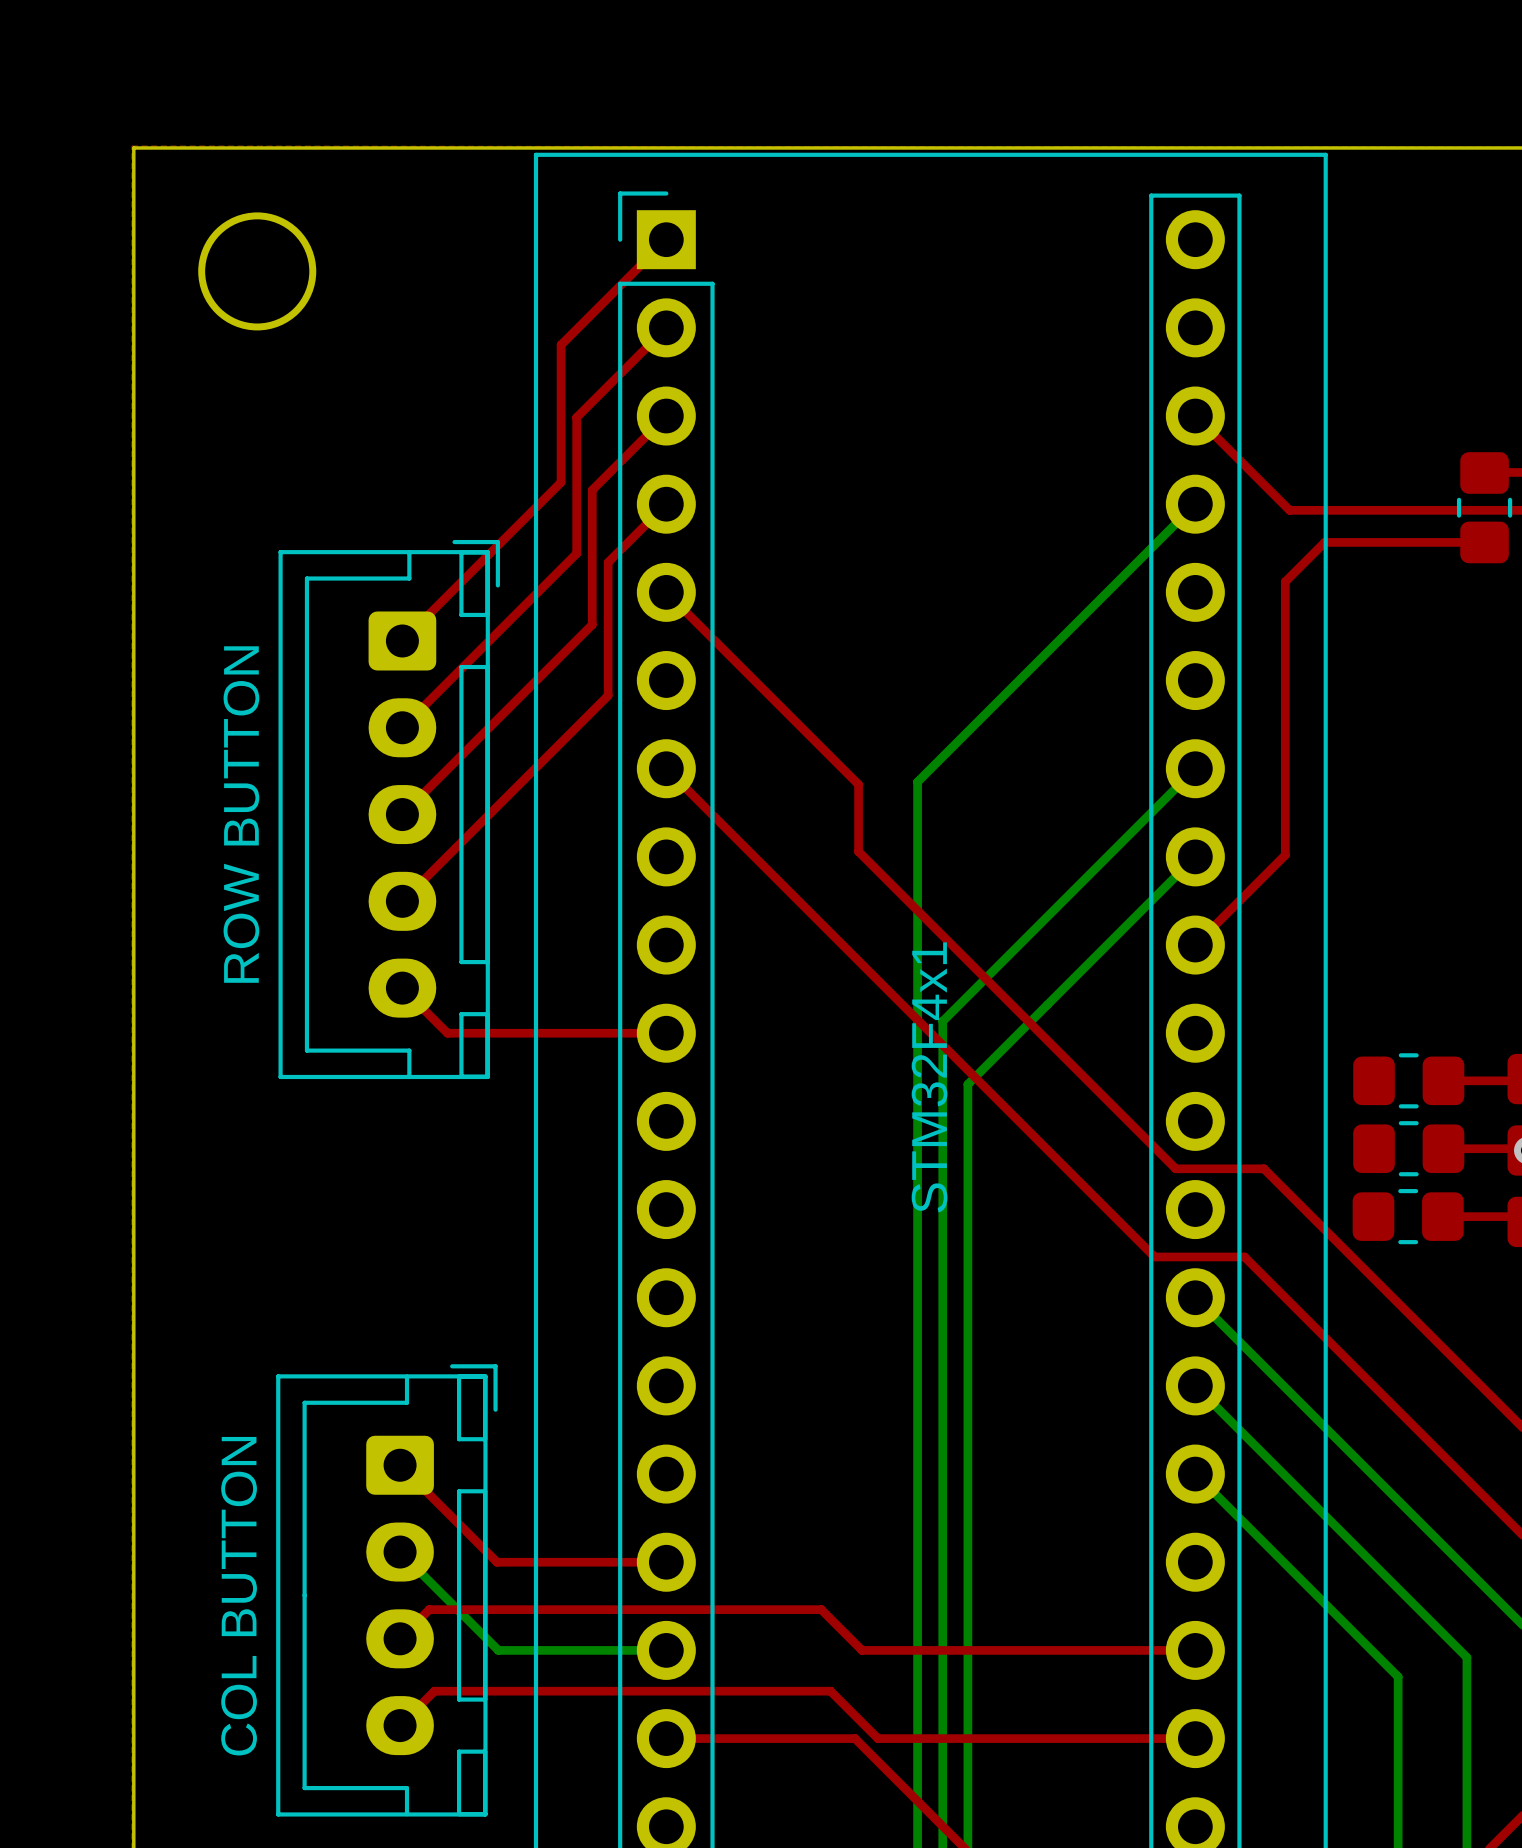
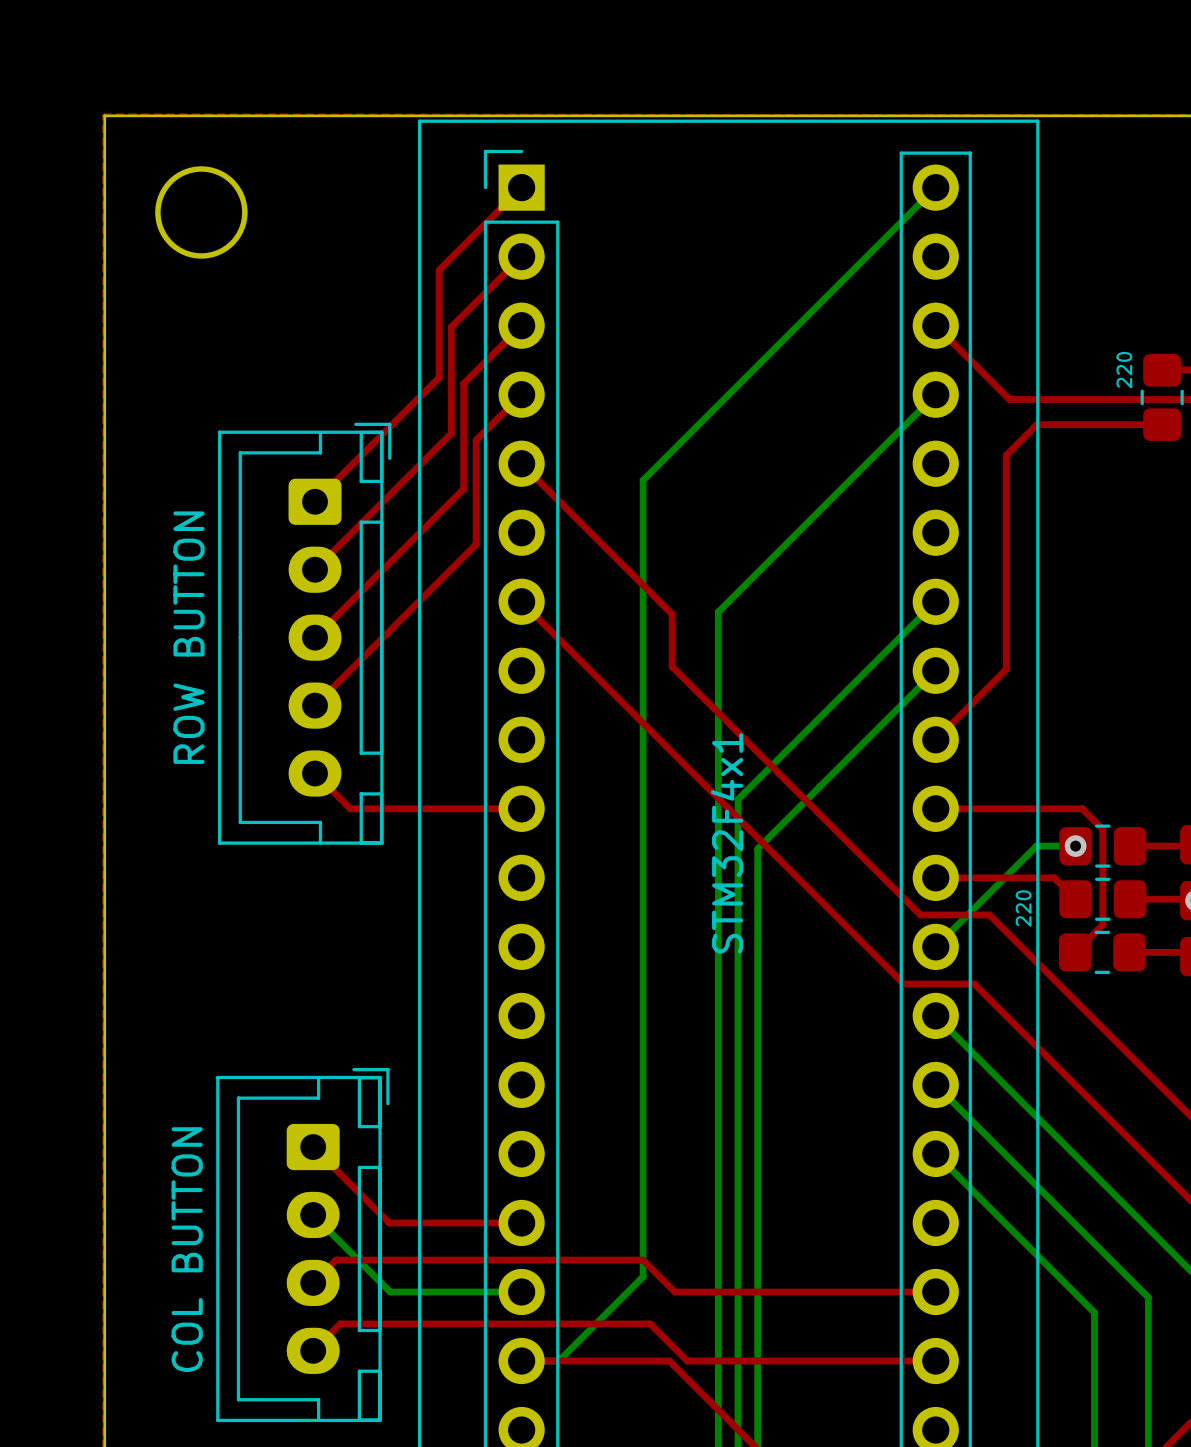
bottom track: none -> (935, 187) (643, 480) (643, 1276) (558, 1361) (521, 1361)
text: none -> 220 (1124, 370)
top track: none -> (935, 808) (1082, 808) (1102, 829) (1102, 924) (1075, 952)
bottom track: none -> (1075, 846) (1036, 846) (935, 946)
via: none -> (1075, 846)
top track: none -> (935, 877) (1054, 877) (1075, 899)
text: none -> 220 (1023, 908)

